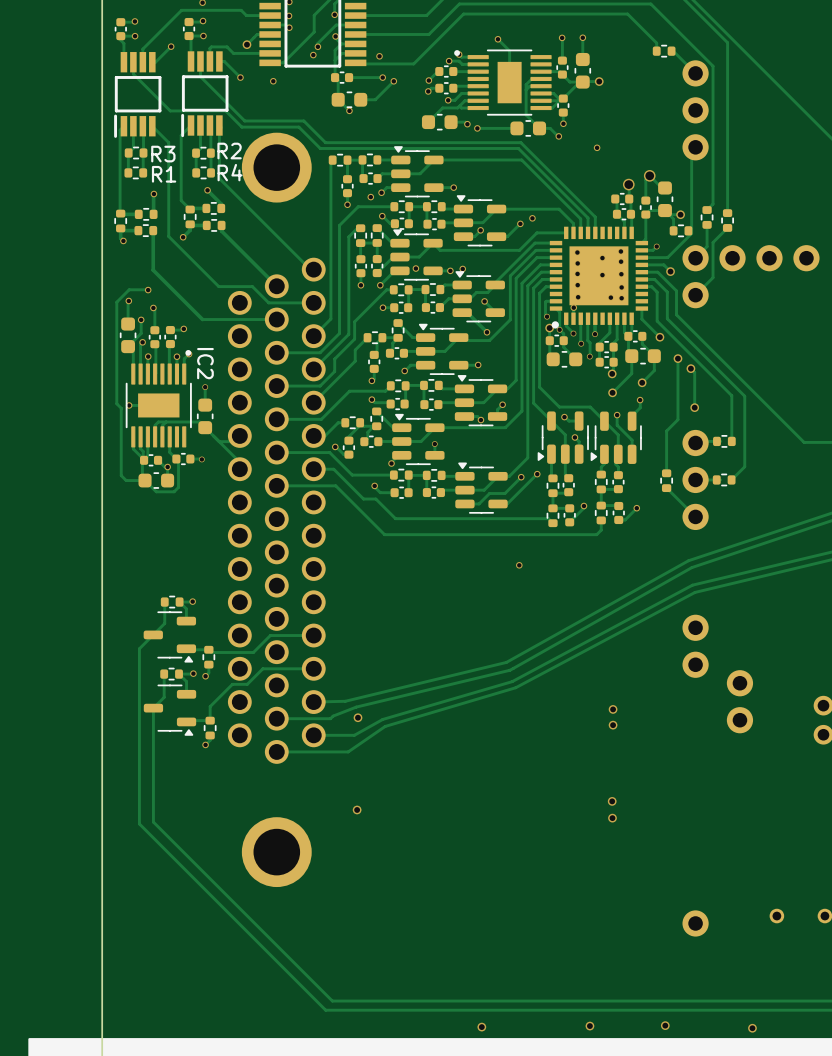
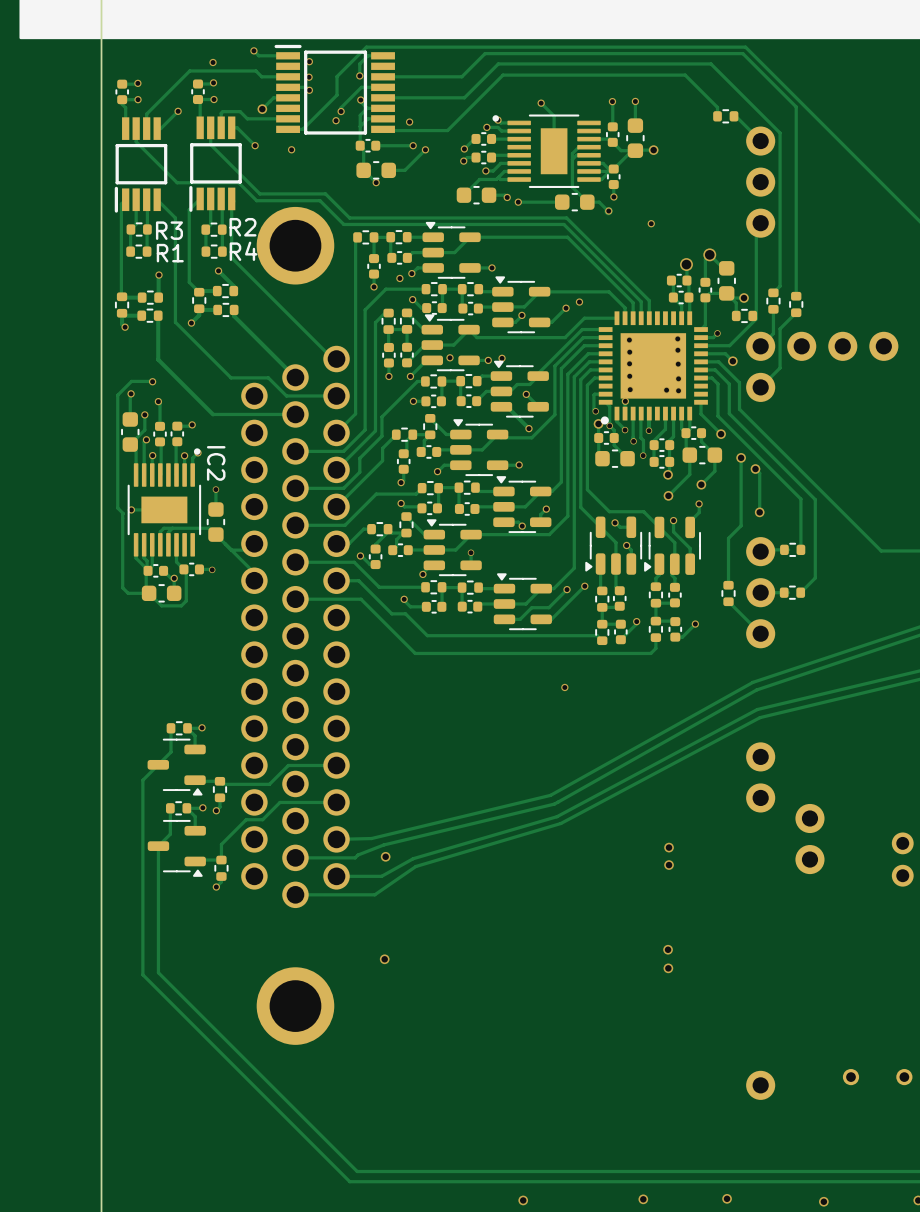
via: (602, 258) -> none
via: (602, 275) -> none

